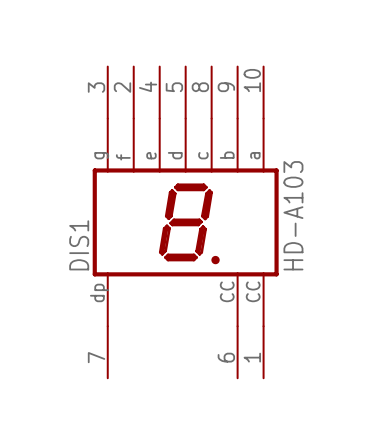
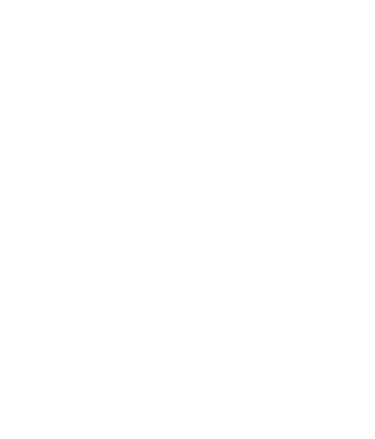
DIS1: HD-A103 (185, 222) -> none

